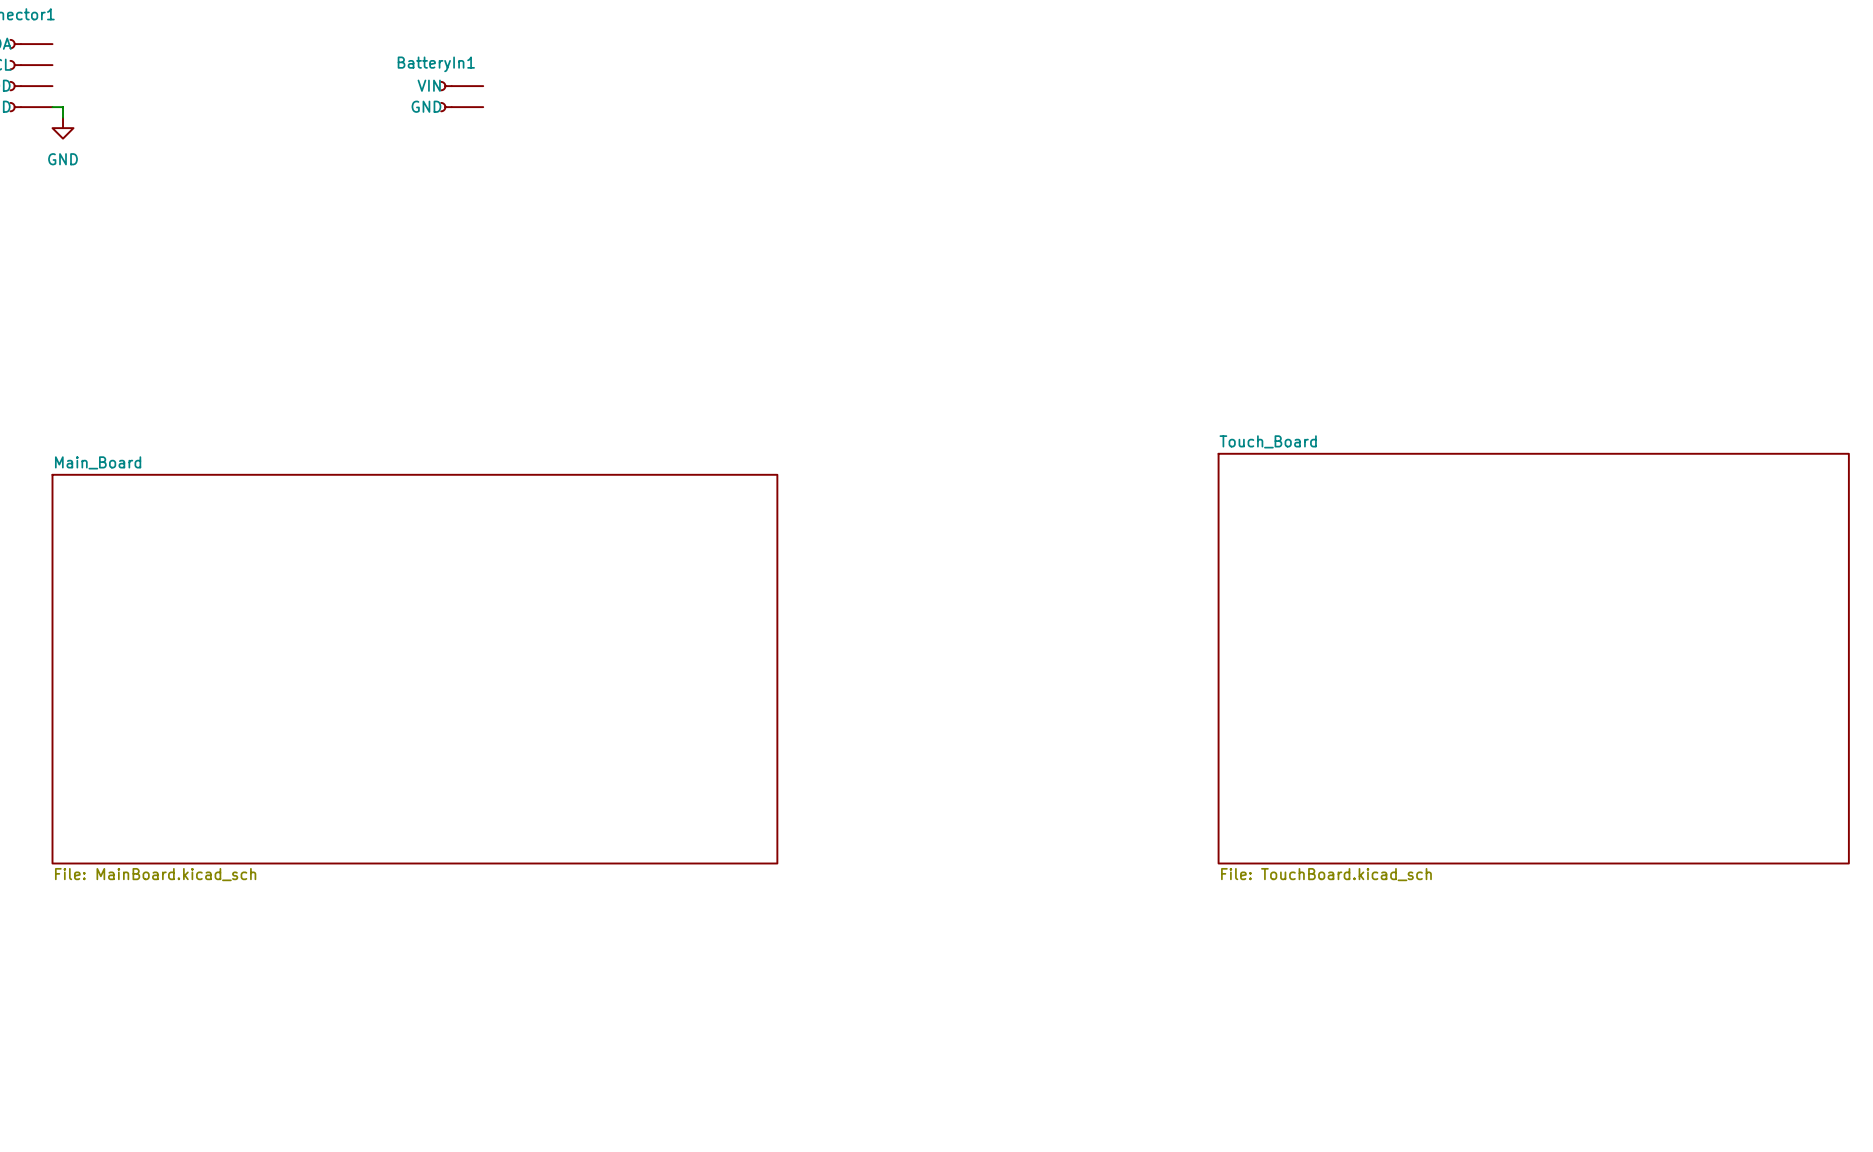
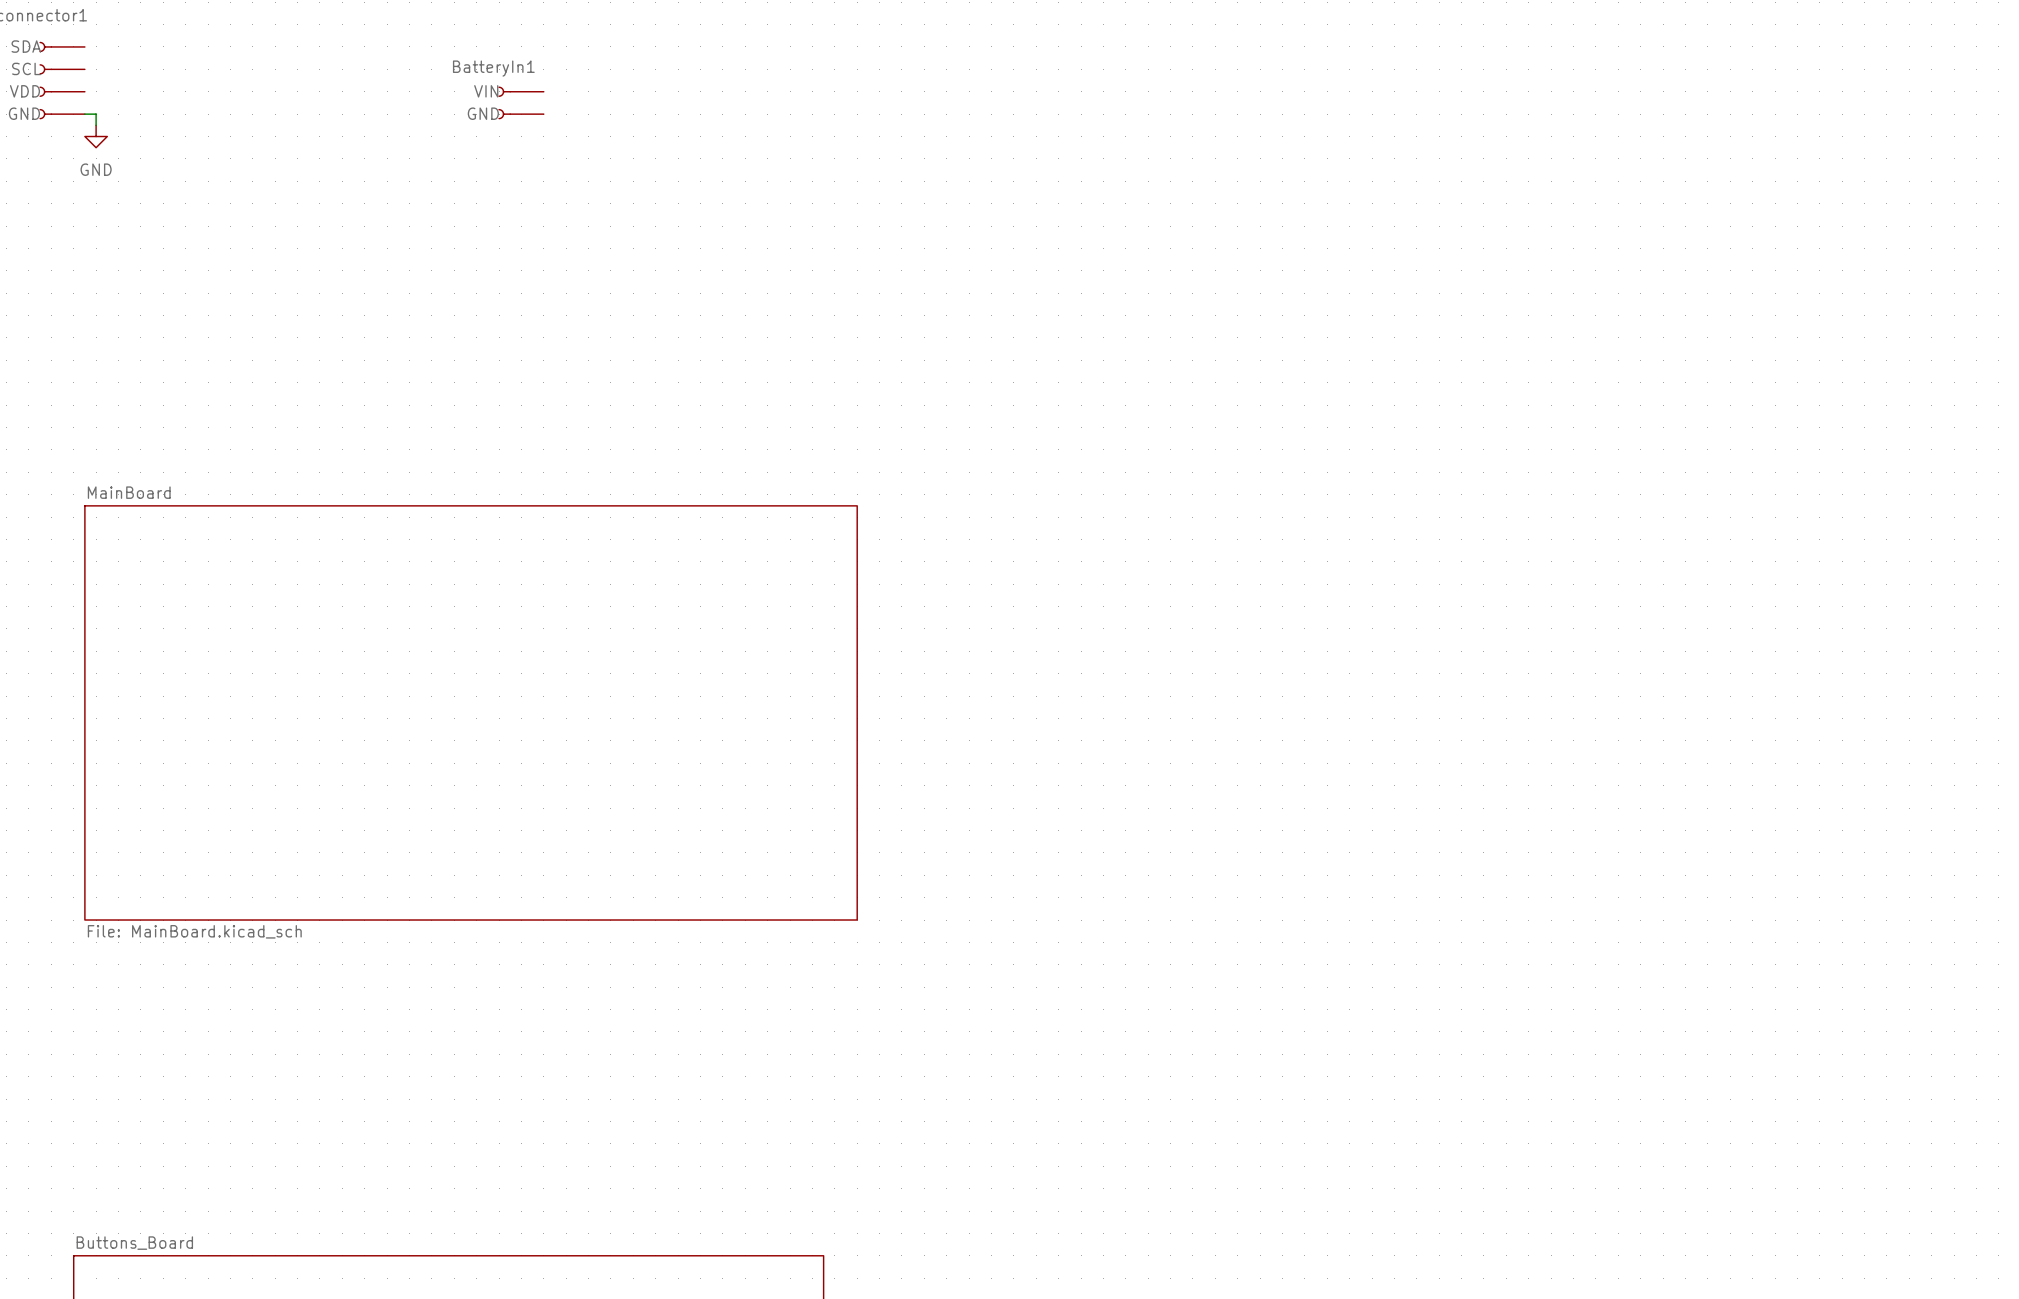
sheet Main_Board name: Main_Board (98, 462) -> MainBoard (129, 492)
sheet Touch_Board: File: TouchBoard.kicad_sch (1533, 658) -> none

